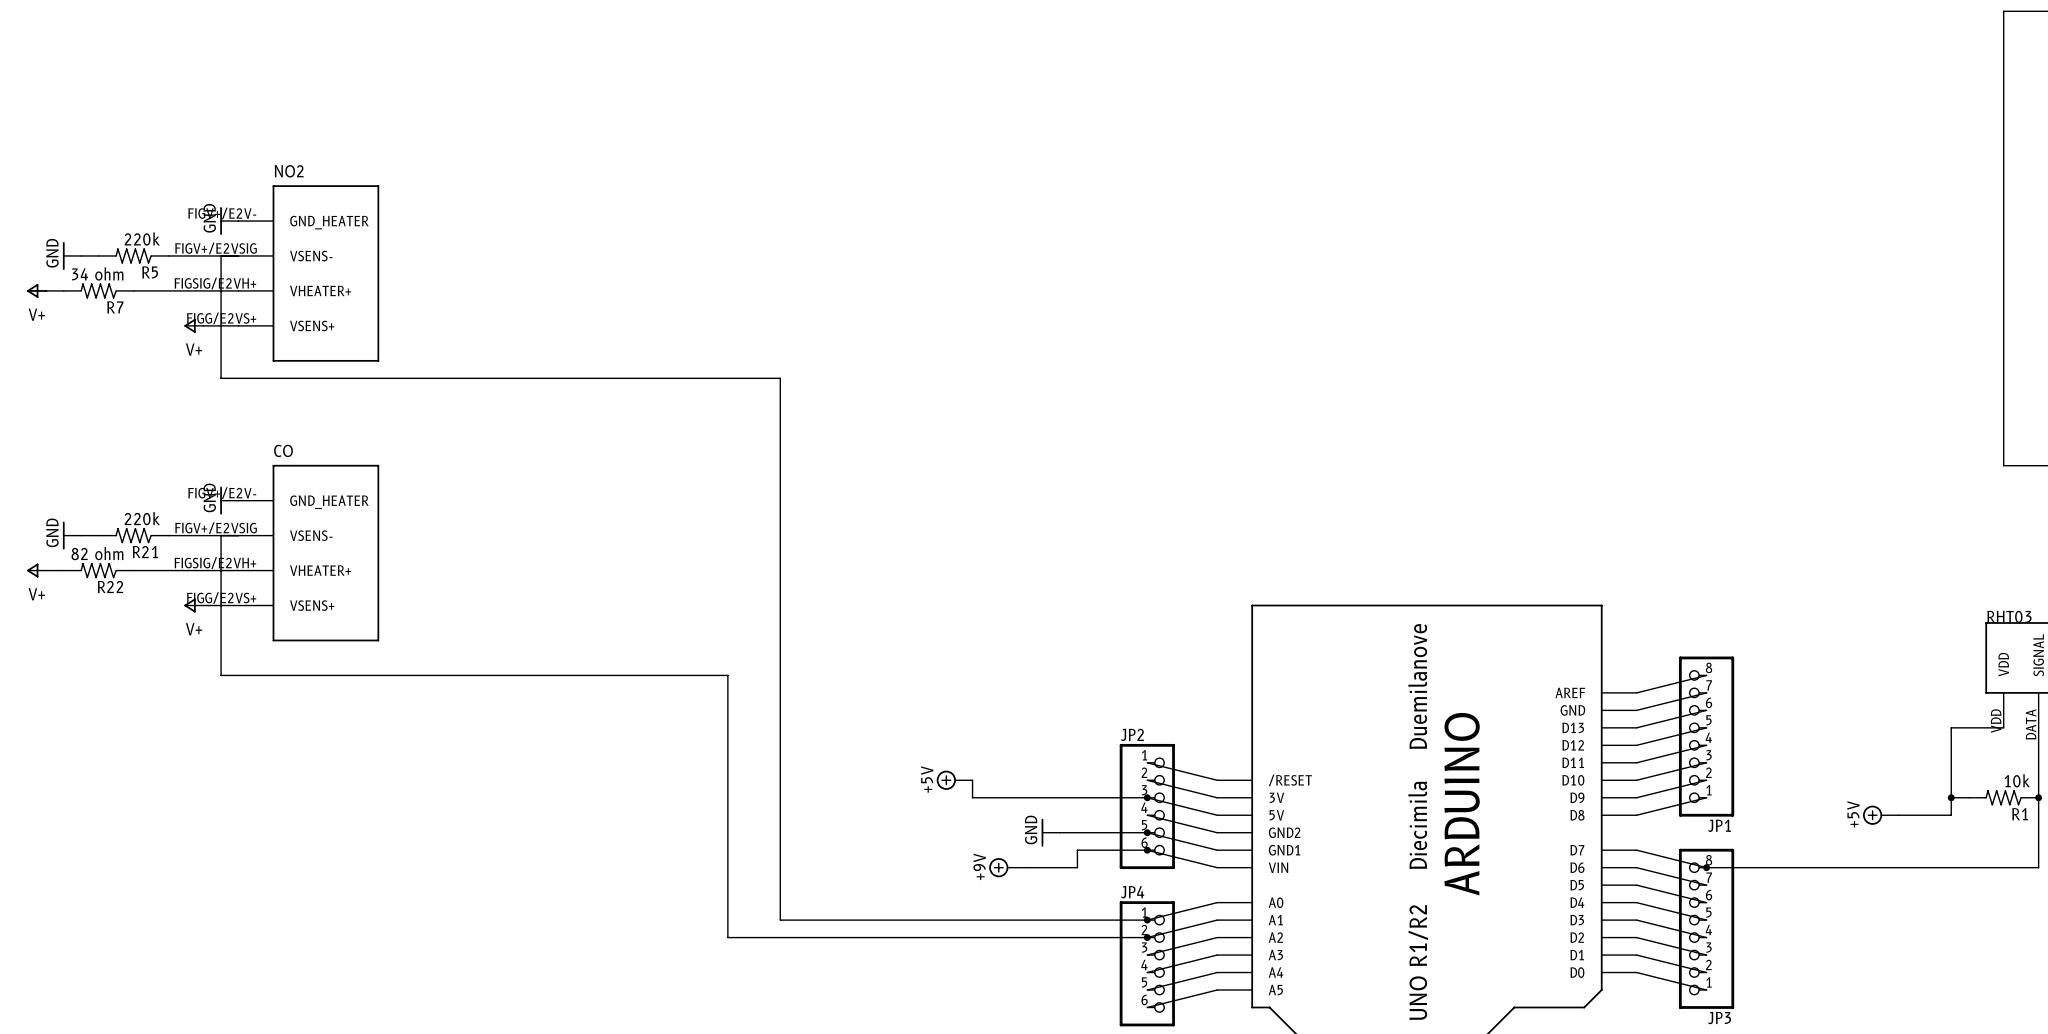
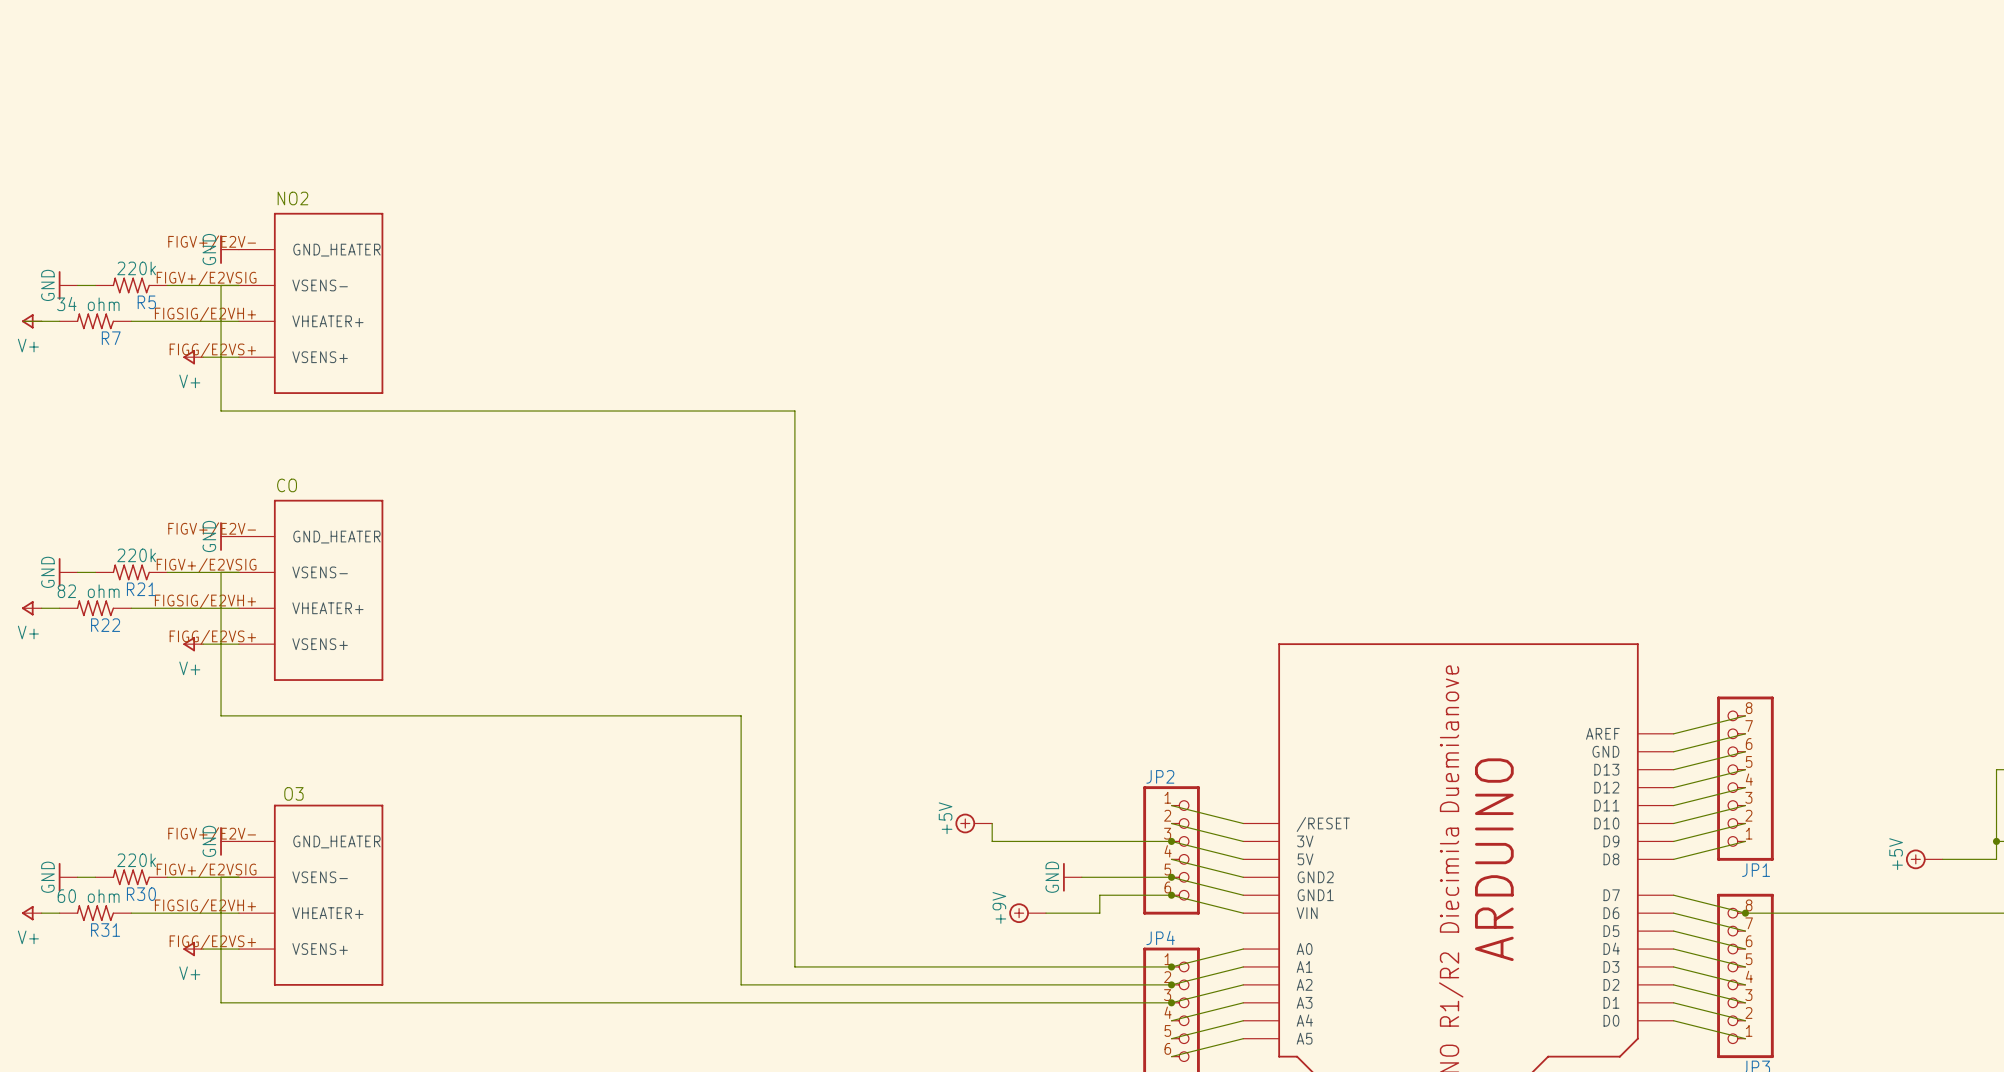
text: none -> O3 (293, 793)
power symbol: none -> GND (229, 841)
power symbol: none -> GND (68, 877)
wire: none -> (77, 877) (95, 877)
R30: none -> 220k (131, 877)
wire: none -> (167, 877) (238, 877)
wire: none -> (221, 877) (221, 1002) (1171, 1002)
part: none -> (311, 895)
power symbol: none -> V+ (31, 913)
wire: none -> (41, 913) (59, 913)
R31: none -> 60 ohm (95, 913)
wire: none -> (131, 913) (238, 913)
power symbol: none -> V+ (193, 949)
wire: none -> (203, 949) (238, 949)
junction: none -> (1171, 1002)

